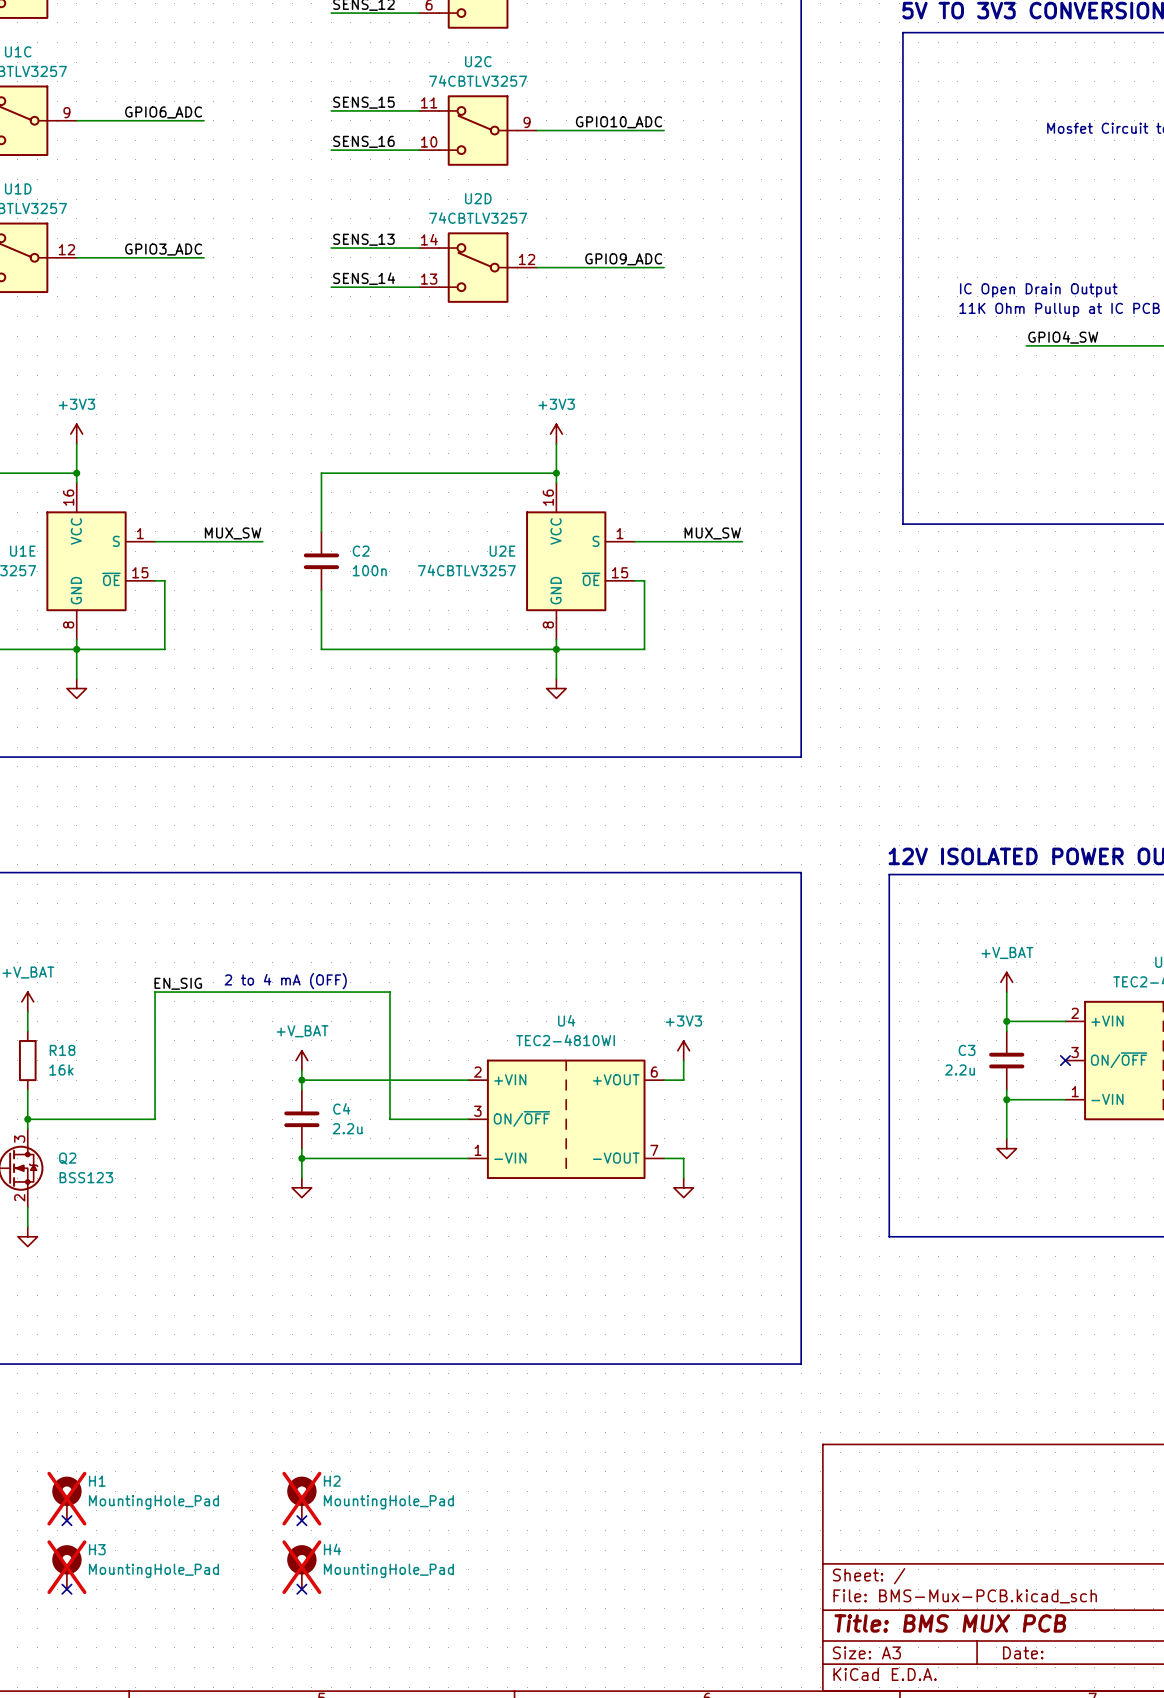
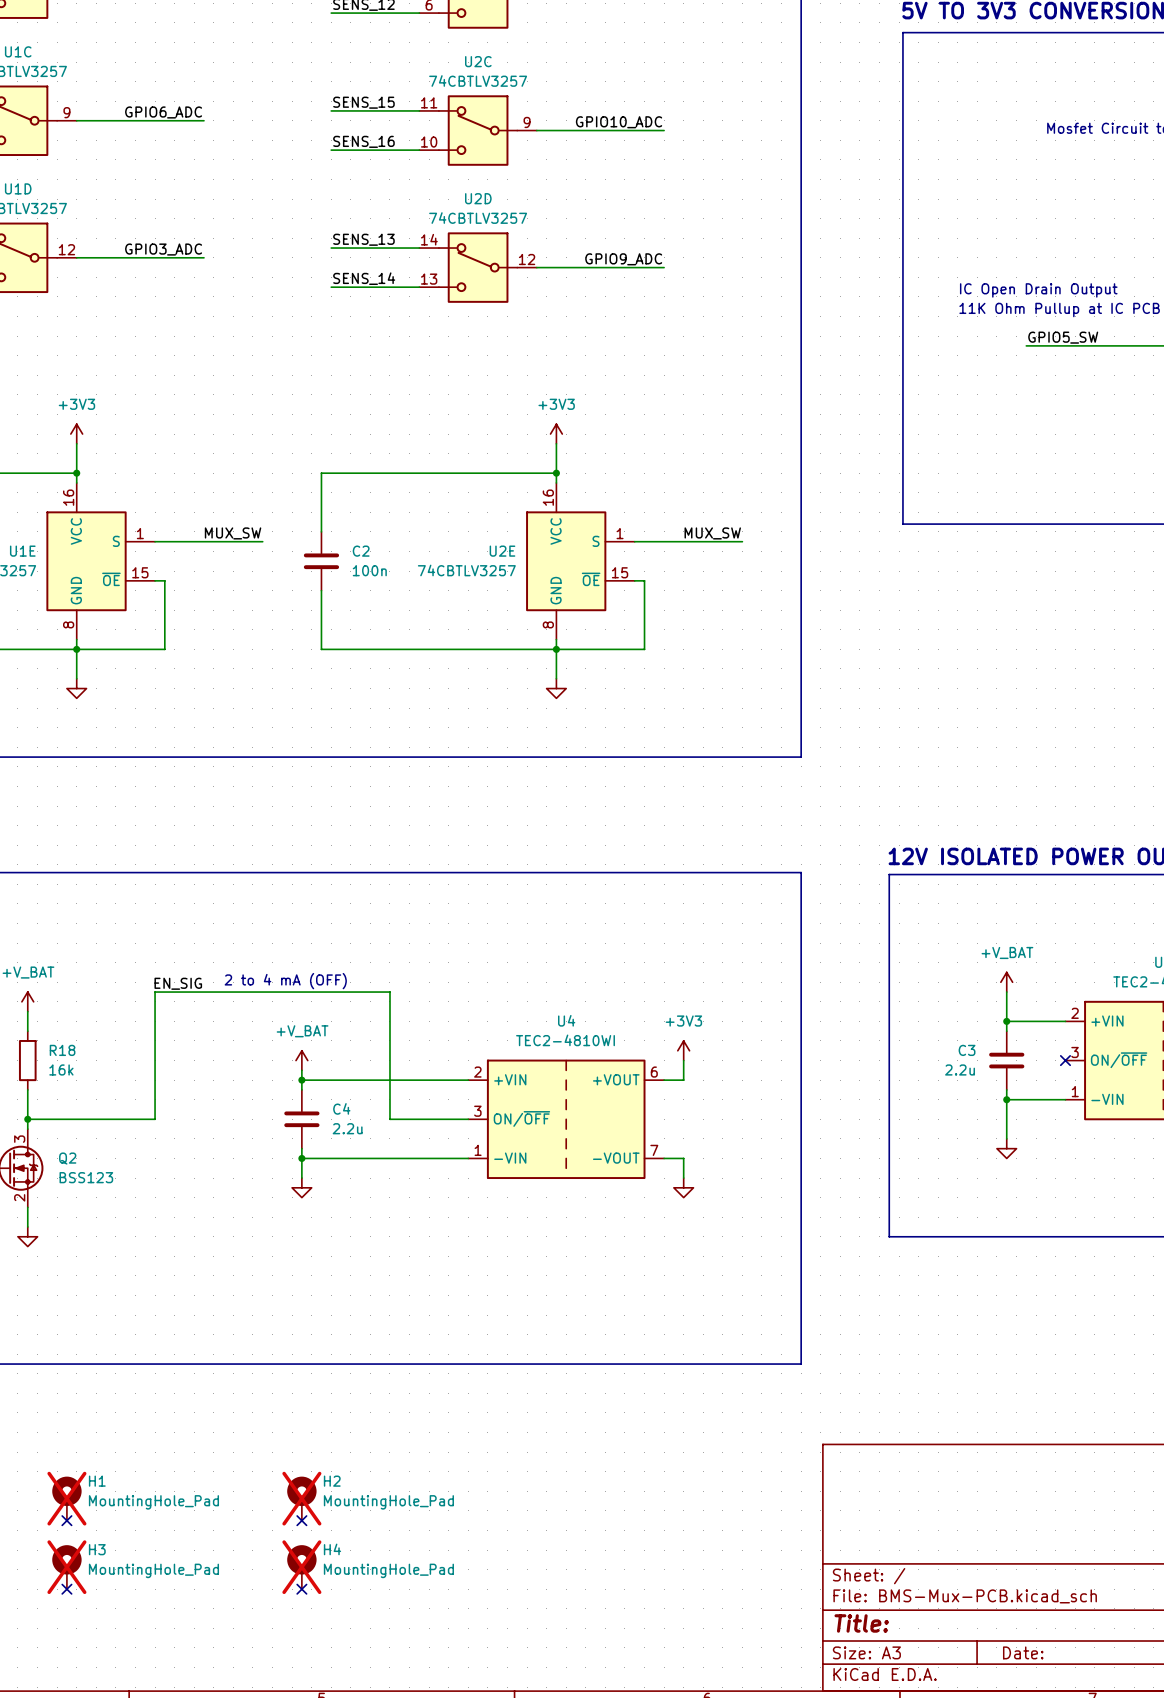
label: GPIO4_SW (1063, 337) -> GPIO5_SW (1063, 337)
title block: Title: BMS MUX PCB (950, 1623) -> Title: (861, 1623)

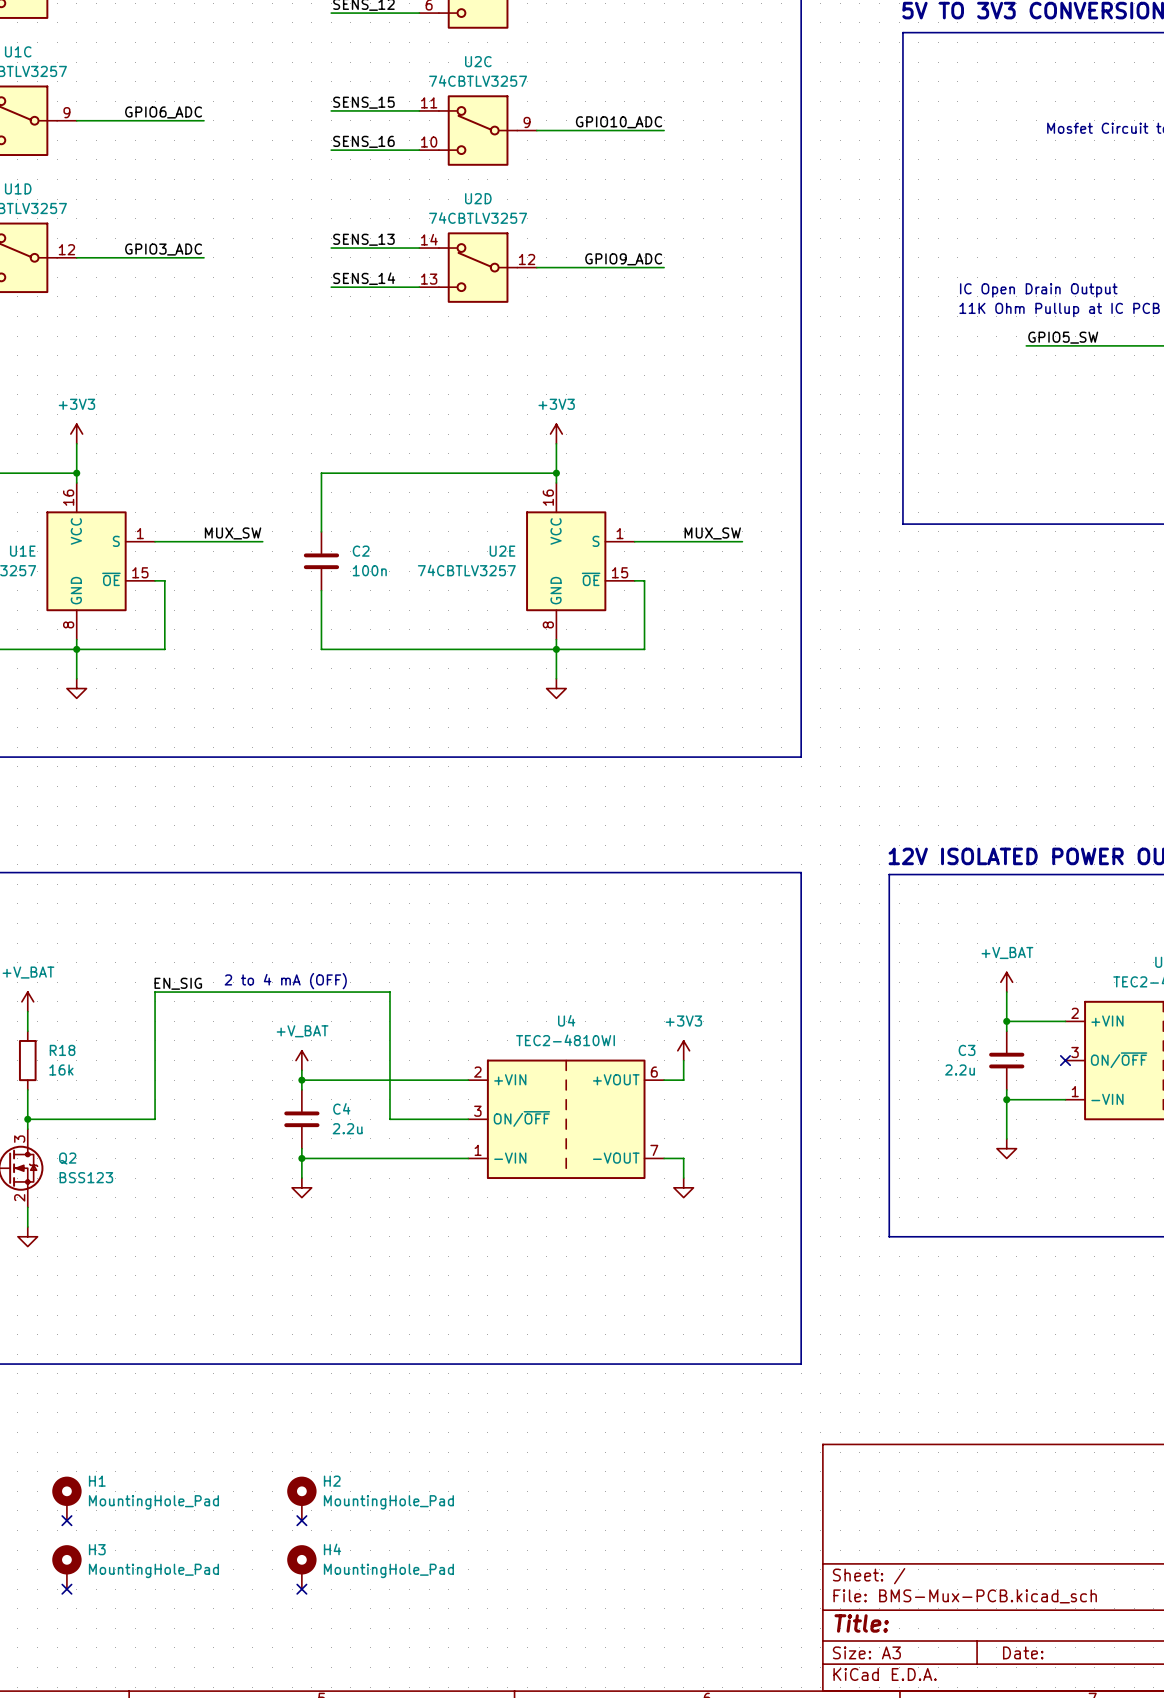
H1 do-not-place cross: (66, 1498) -> none
H2 do-not-place cross: (301, 1498) -> none
H3 do-not-place cross: (66, 1567) -> none
H4 do-not-place cross: (301, 1567) -> none

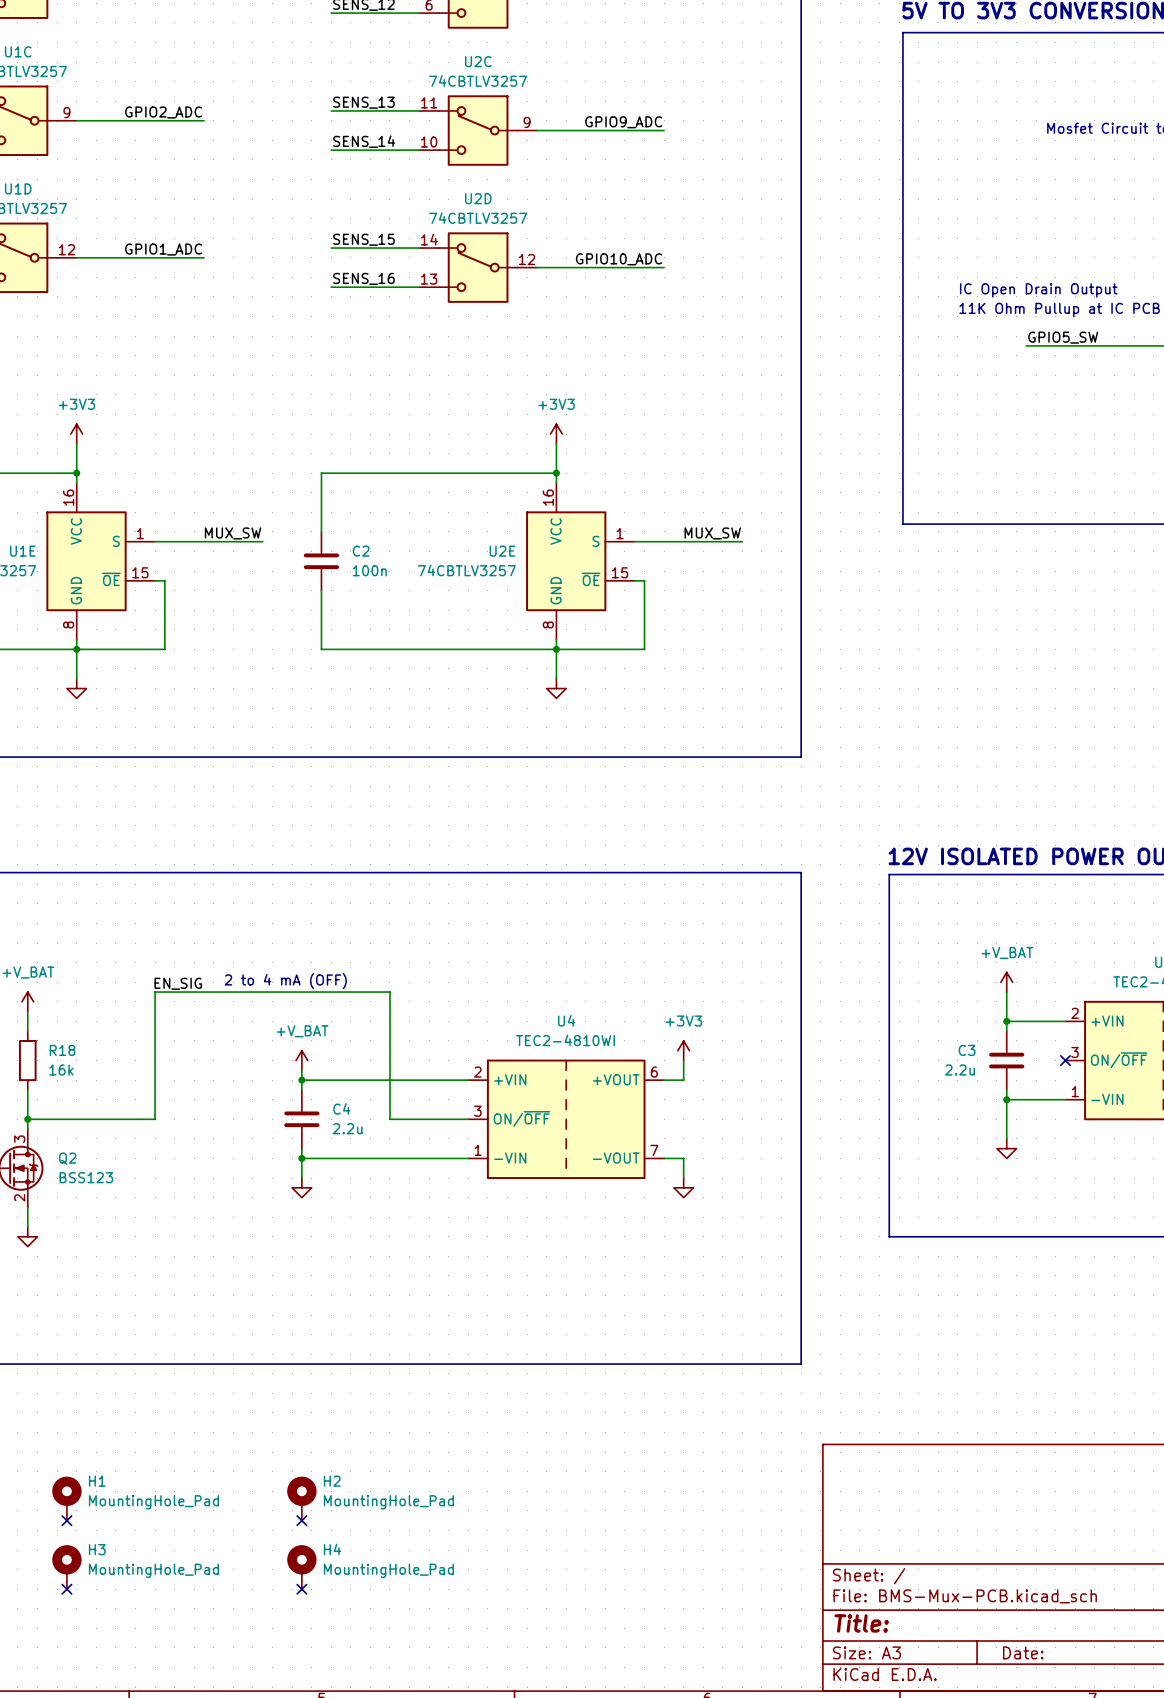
label: SENS_15 (363, 102) -> SENS_13 (363, 102)
label: GPIO6_ADC (163, 112) -> GPIO2_ADC (163, 112)
label: GPIO10_ADC (619, 122) -> GPIO9_ADC (623, 122)
label: SENS_16 (363, 141) -> SENS_14 (364, 141)
label: SENS_13 (363, 239) -> SENS_15 (363, 239)
label: GPIO3_ADC (163, 249) -> GPIO1_ADC (163, 249)
label: GPIO9_ADC (623, 259) -> GPIO10_ADC (619, 259)
label: SENS_14 (364, 278) -> SENS_16 (363, 278)

